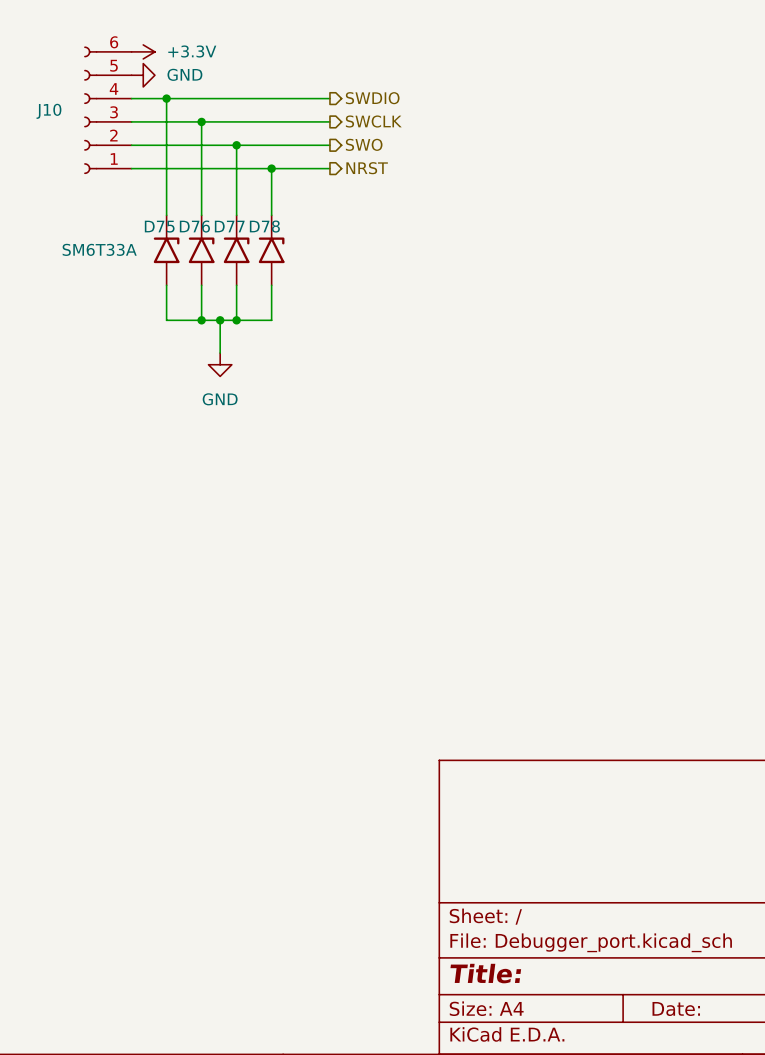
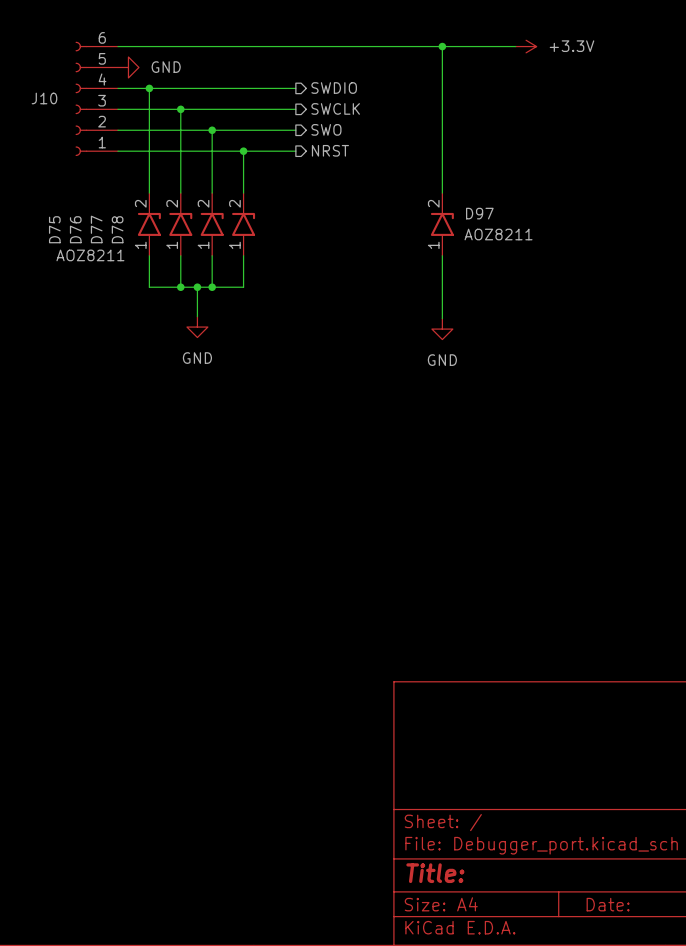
wire: none -> (117, 46) (515, 46)
power symbol: +3.3V (143, 51) -> none
wire: none -> (442, 46) (442, 193)
junction: none -> (442, 46)
power symbol: none -> +3.3V (526, 46)
D75 name rotation: 0° (159, 226) -> 90° counterclockwise (54, 229)
D75 name position: D75 (159, 226) -> D75 (54, 229)
D76 name rotation: 0° (194, 226) -> 90° counterclockwise (75, 229)
D76 name position: D76 (194, 226) -> D76 (75, 229)
D77 name rotation: 0° (229, 226) -> 90° counterclockwise (96, 229)
D77 name position: D77 (229, 226) -> D77 (96, 229)
D78 name rotation: 0° (264, 226) -> 90° counterclockwise (117, 229)
D78 name position: D78 (264, 226) -> D78 (117, 229)
D75 pin number: none -> 2 (140, 203)
D76 pin number: none -> 2 (172, 203)
D77 pin number: none -> 2 (203, 203)
D78 pin number: none -> 2 (234, 203)
D75 value: SM6T33A (99, 249) -> AOZ8211 (90, 255)
D97: none -> AOZ8211 (442, 224)
D75 pin number: none -> 1 (140, 245)
D76 pin number: none -> 1 (172, 245)
D77 pin number: none -> 1 (203, 245)
D78 pin number: none -> 1 (234, 245)
wire: none -> (442, 255) (442, 318)
power symbol: none -> GND (442, 329)

